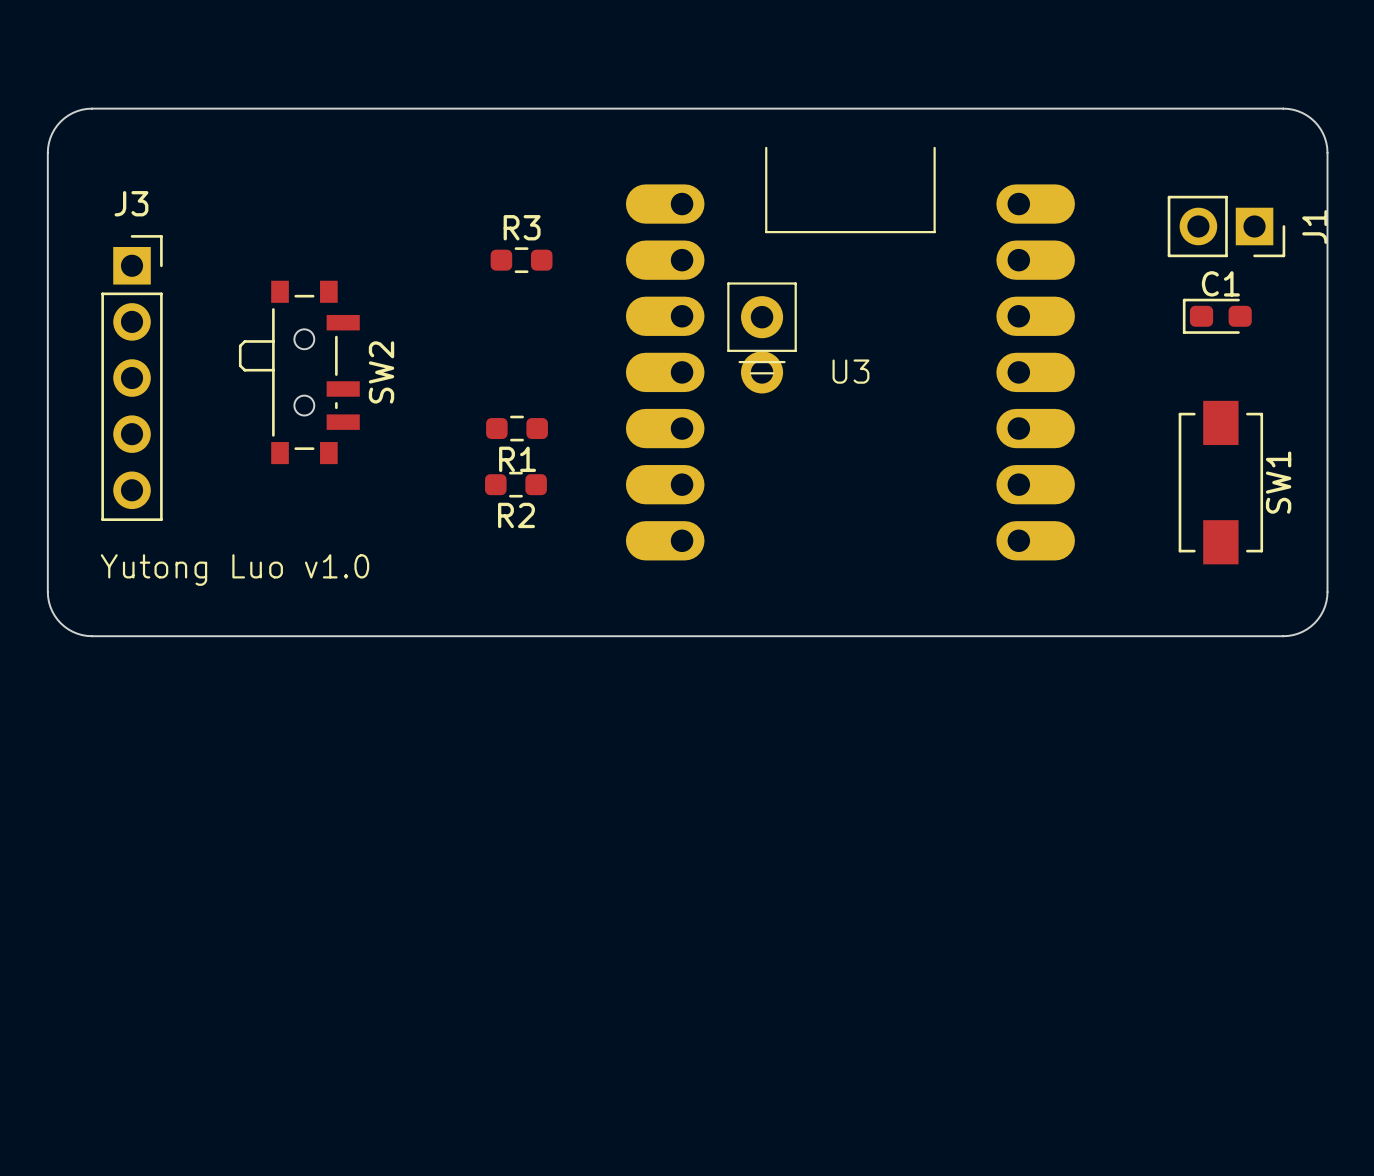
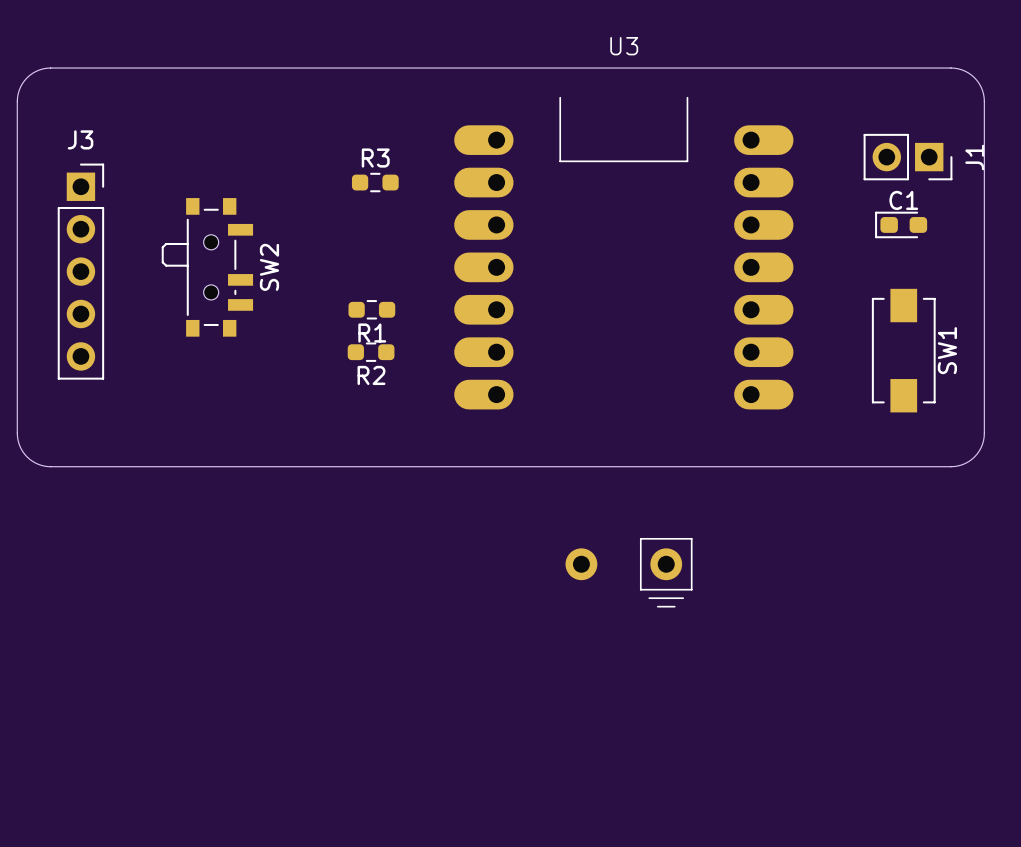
U3 footprint: [625, 146, 1075, 561] -> [454, 96, 794, 608]
U3 name position: U3 (850, 371) -> U3 (624, 46)
text: Yutong Luo v1.0 (235, 570) -> none

